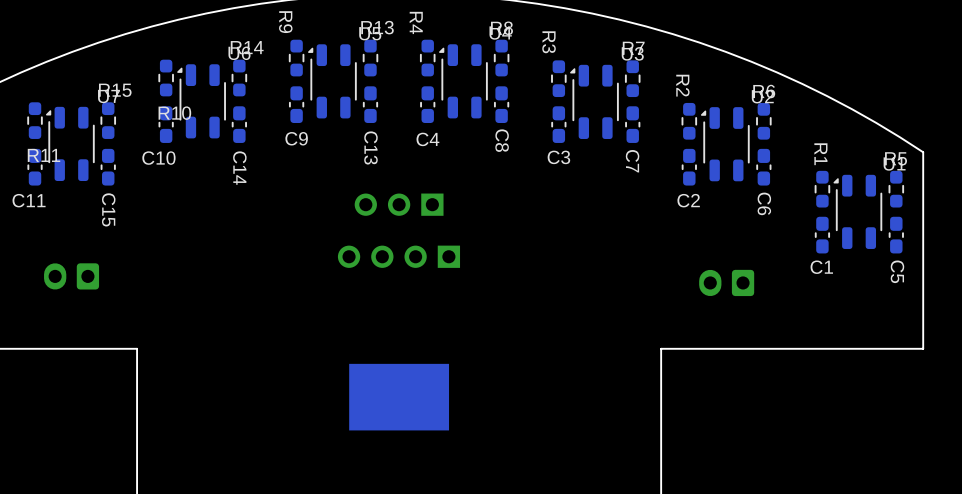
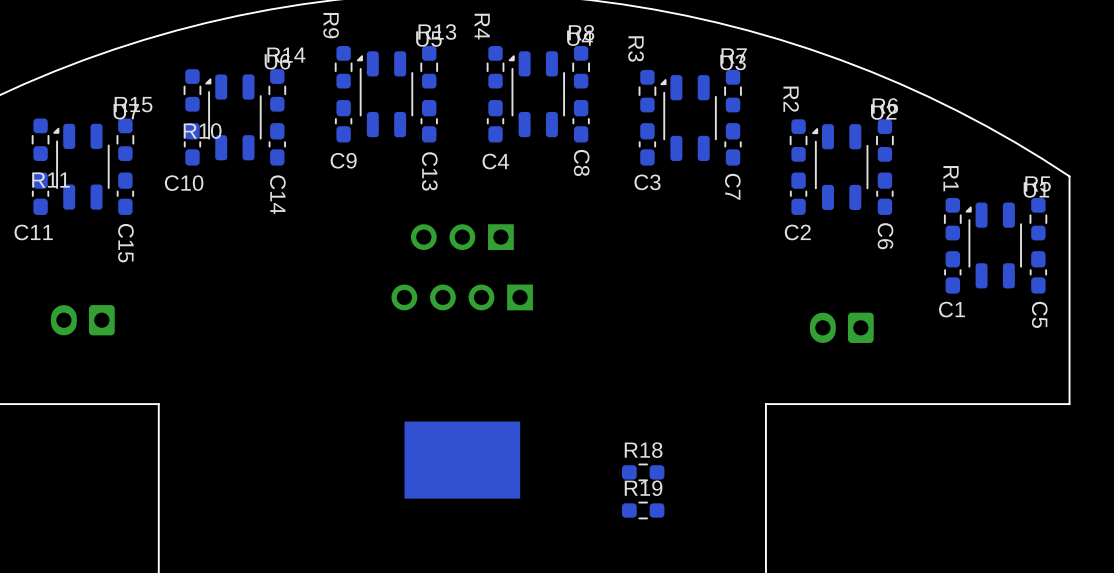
R18: none -> (643, 472)
R19: none -> (643, 510)

